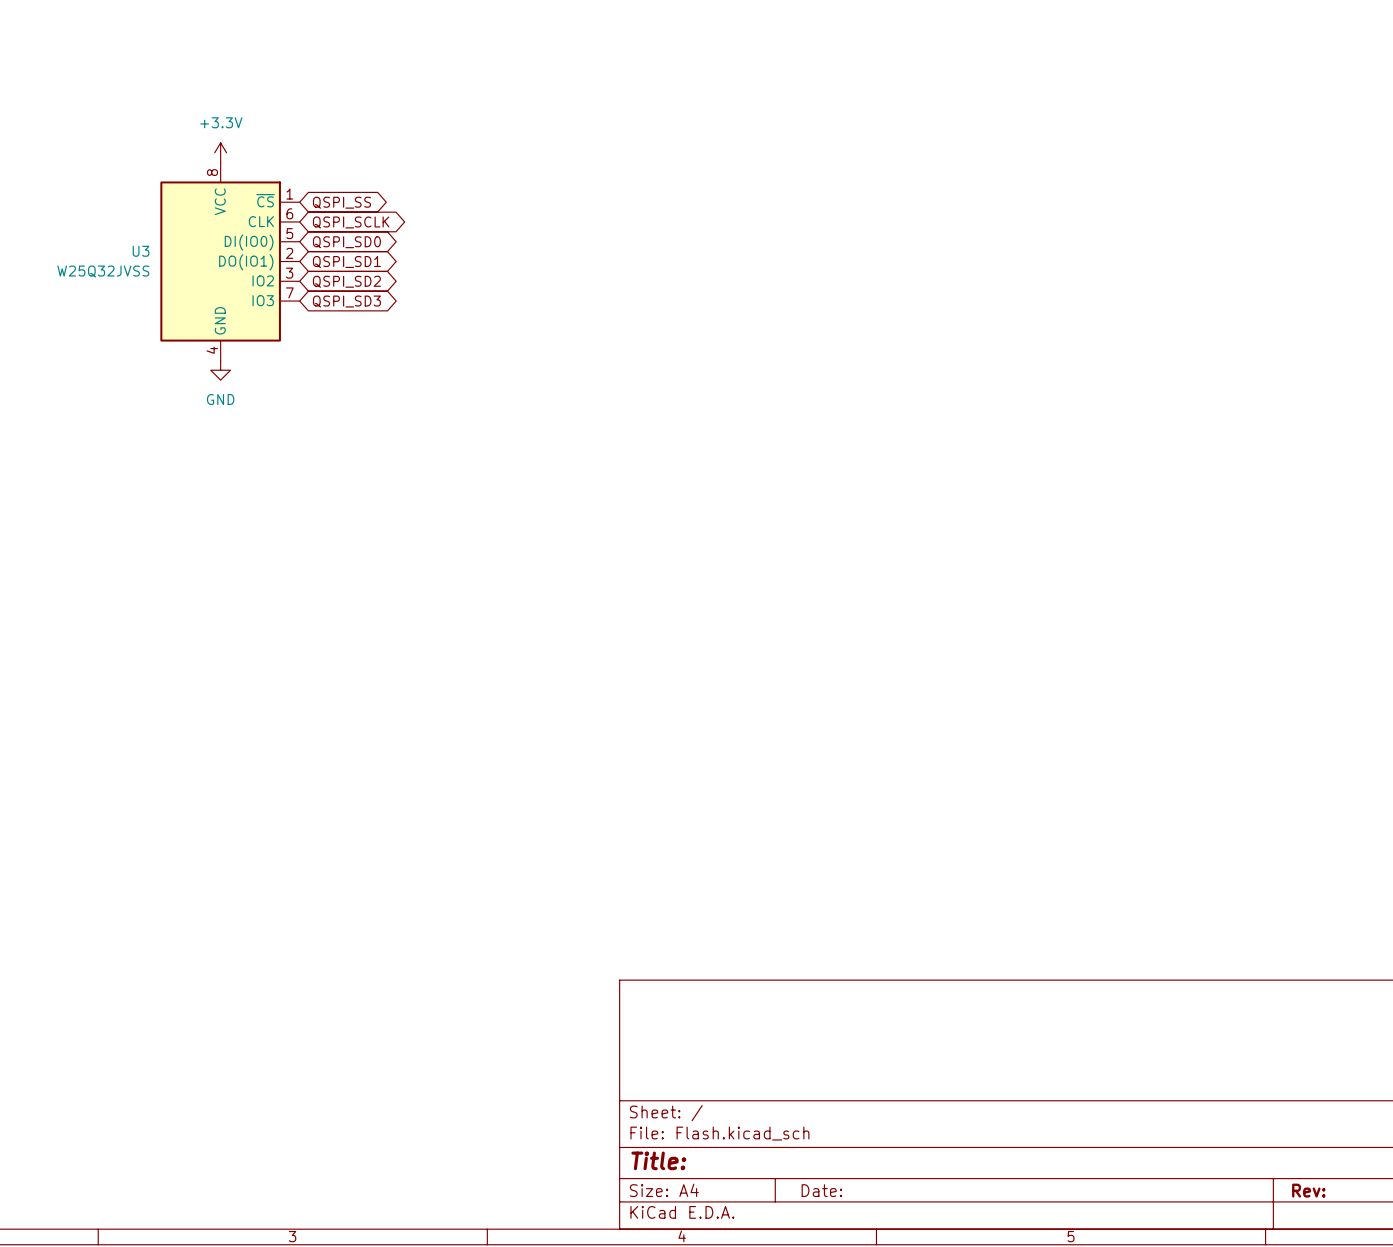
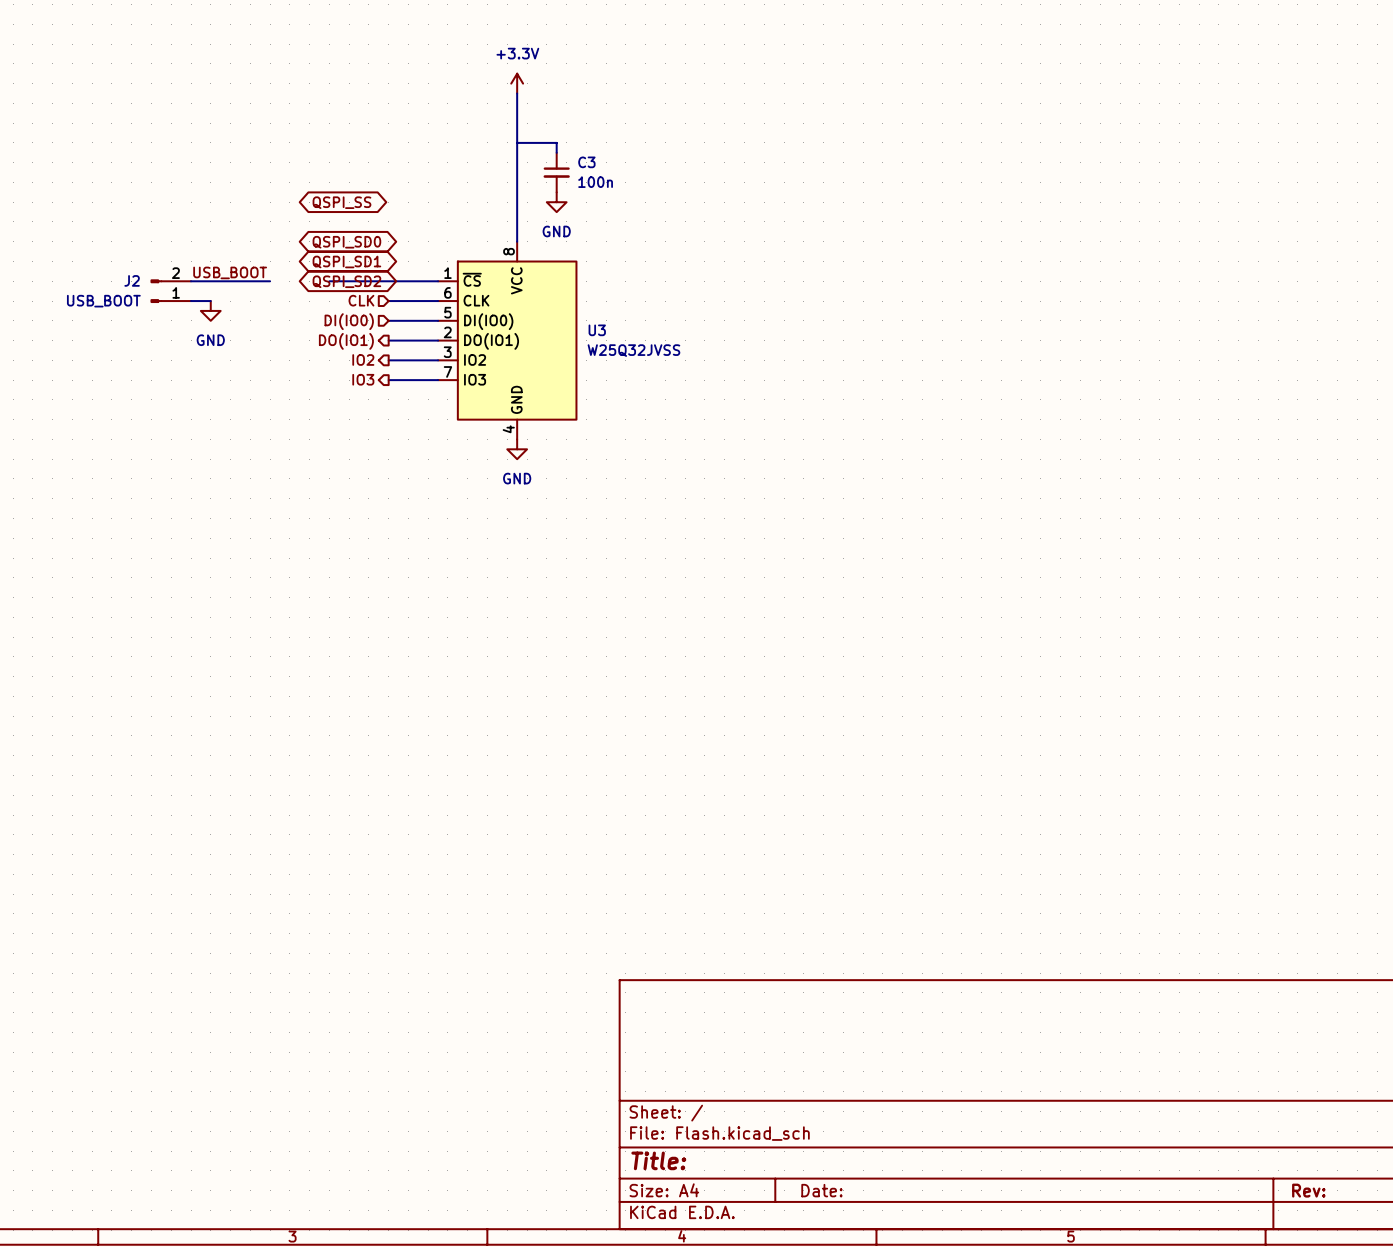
power symbol: none -> +3.3V (517, 83)
wire: none -> (517, 93) (517, 241)
wire: none -> (517, 142) (556, 142) (556, 152)
power symbol: +3.3V (220, 152) -> none
C3: none -> 100n (556, 172)
power symbol: none -> GND (556, 202)
global label: QSPI_SCLK (351, 222) -> none
U3 flip: as is (220, 261) -> left-right (517, 340)
U3 position: (230, 261) -> (507, 340)
label: none -> USB_BOOT (230, 272)
wire: none -> (329, 281) (438, 281)
J2: none -> USB_BOOT (170, 291)
hierarchical label: none -> CLK (361, 300)
global label: QSPI_SD3 (346, 301) -> none
wire: none -> (388, 301) (438, 301)
wire: none -> (388, 320) (438, 320)
hierarchical label: none -> DI(IO0) (349, 321)
wire: none -> (388, 340) (438, 340)
hierarchical label: none -> DO(IO1) (346, 341)
hierarchical label: none -> IO2 (363, 359)
wire: none -> (388, 360) (438, 360)
power symbol position: GND (220, 370) -> GND (210, 310)
hierarchical label: none -> IO3 (363, 379)
wire: none -> (388, 380) (438, 380)
power symbol: none -> GND (517, 449)

